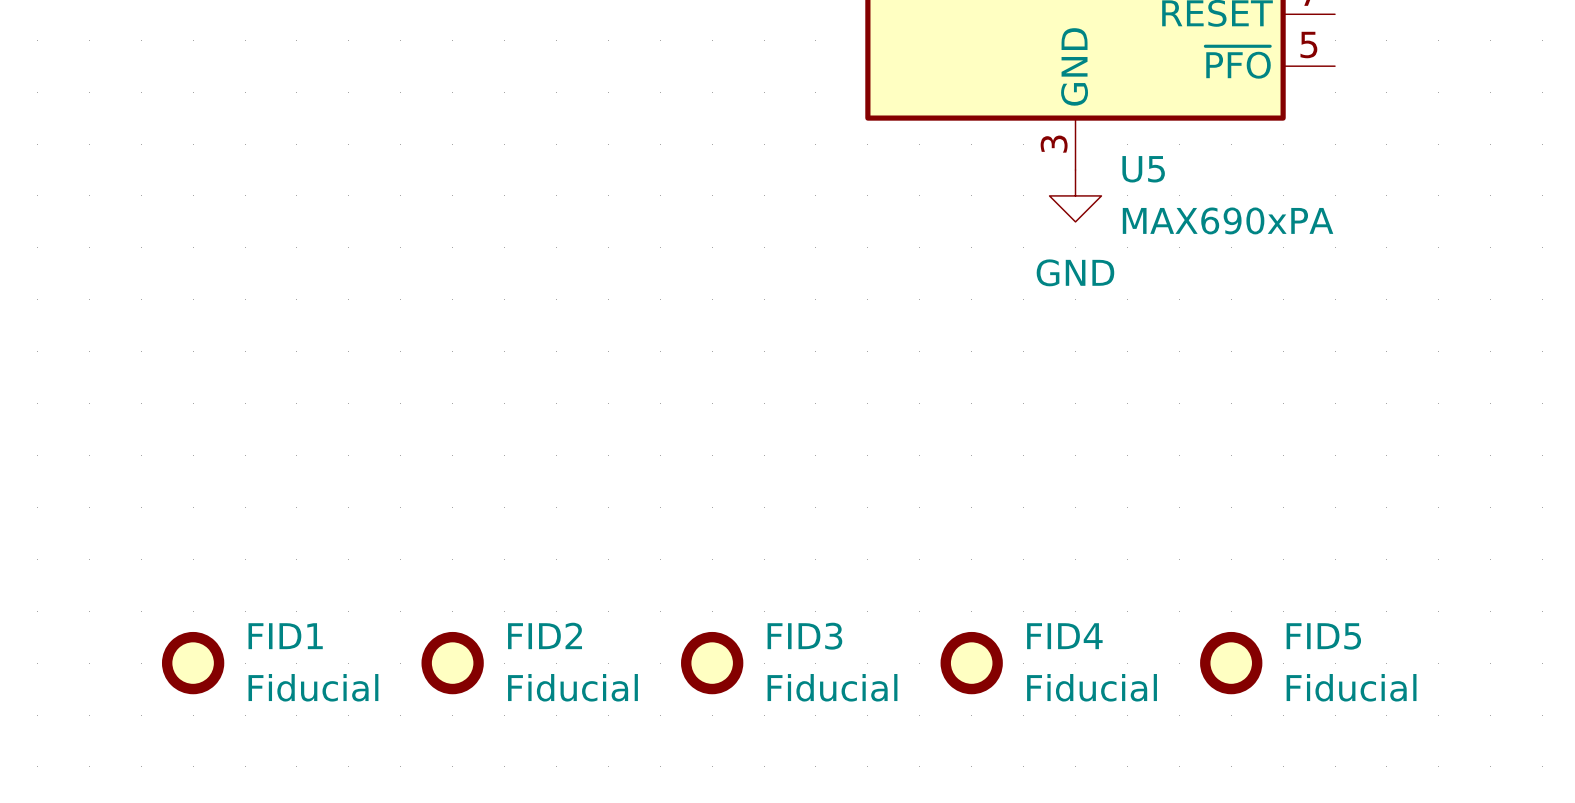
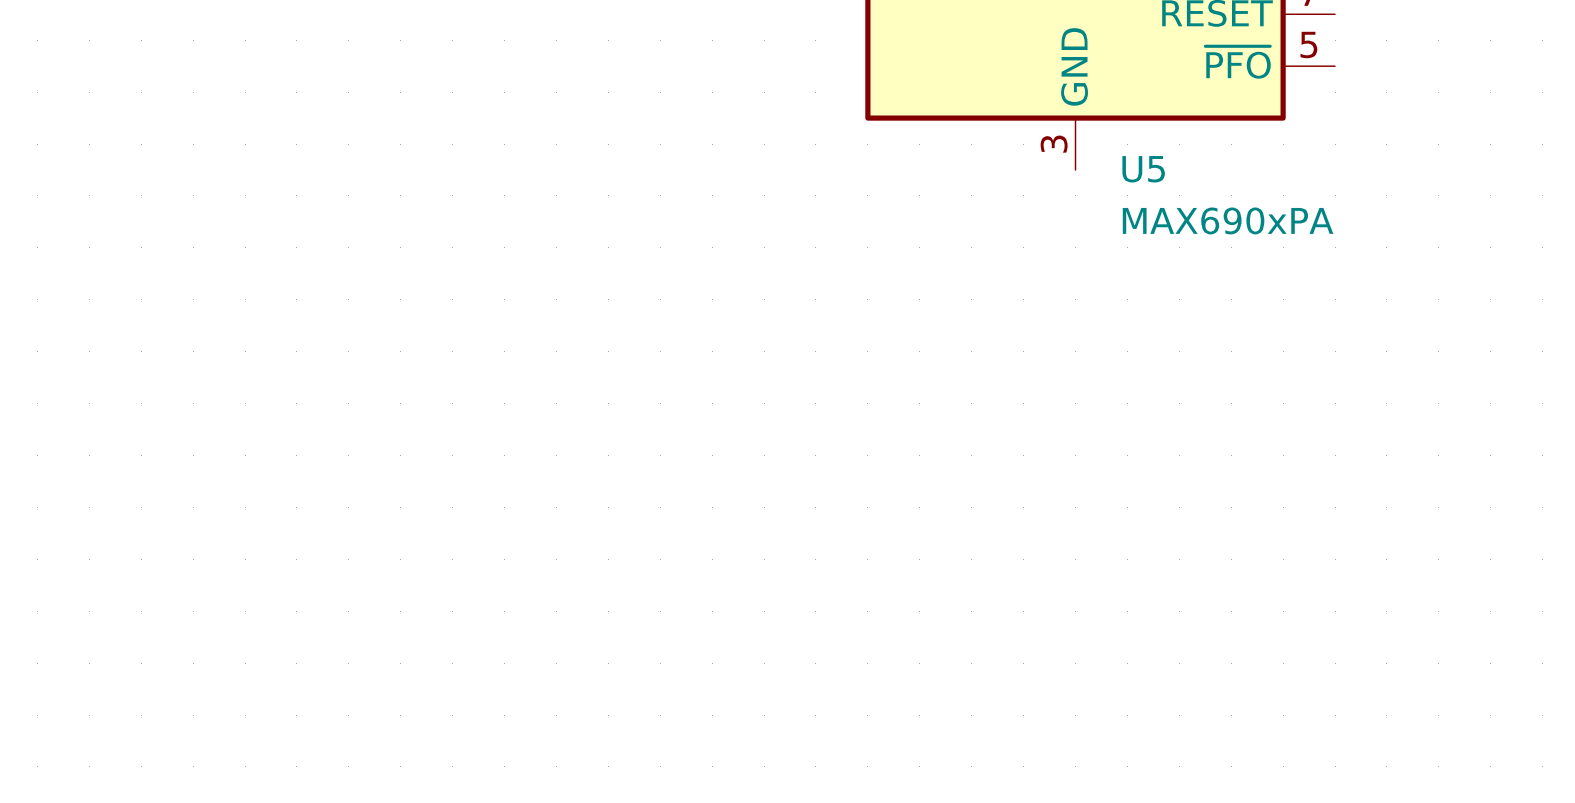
power symbol: GND (1075, 195) -> none
FID1: Fiducial (193, 663) -> none
FID2: Fiducial (452, 663) -> none
FID3: Fiducial (712, 663) -> none
FID4: Fiducial (971, 663) -> none
FID5: Fiducial (1231, 663) -> none

